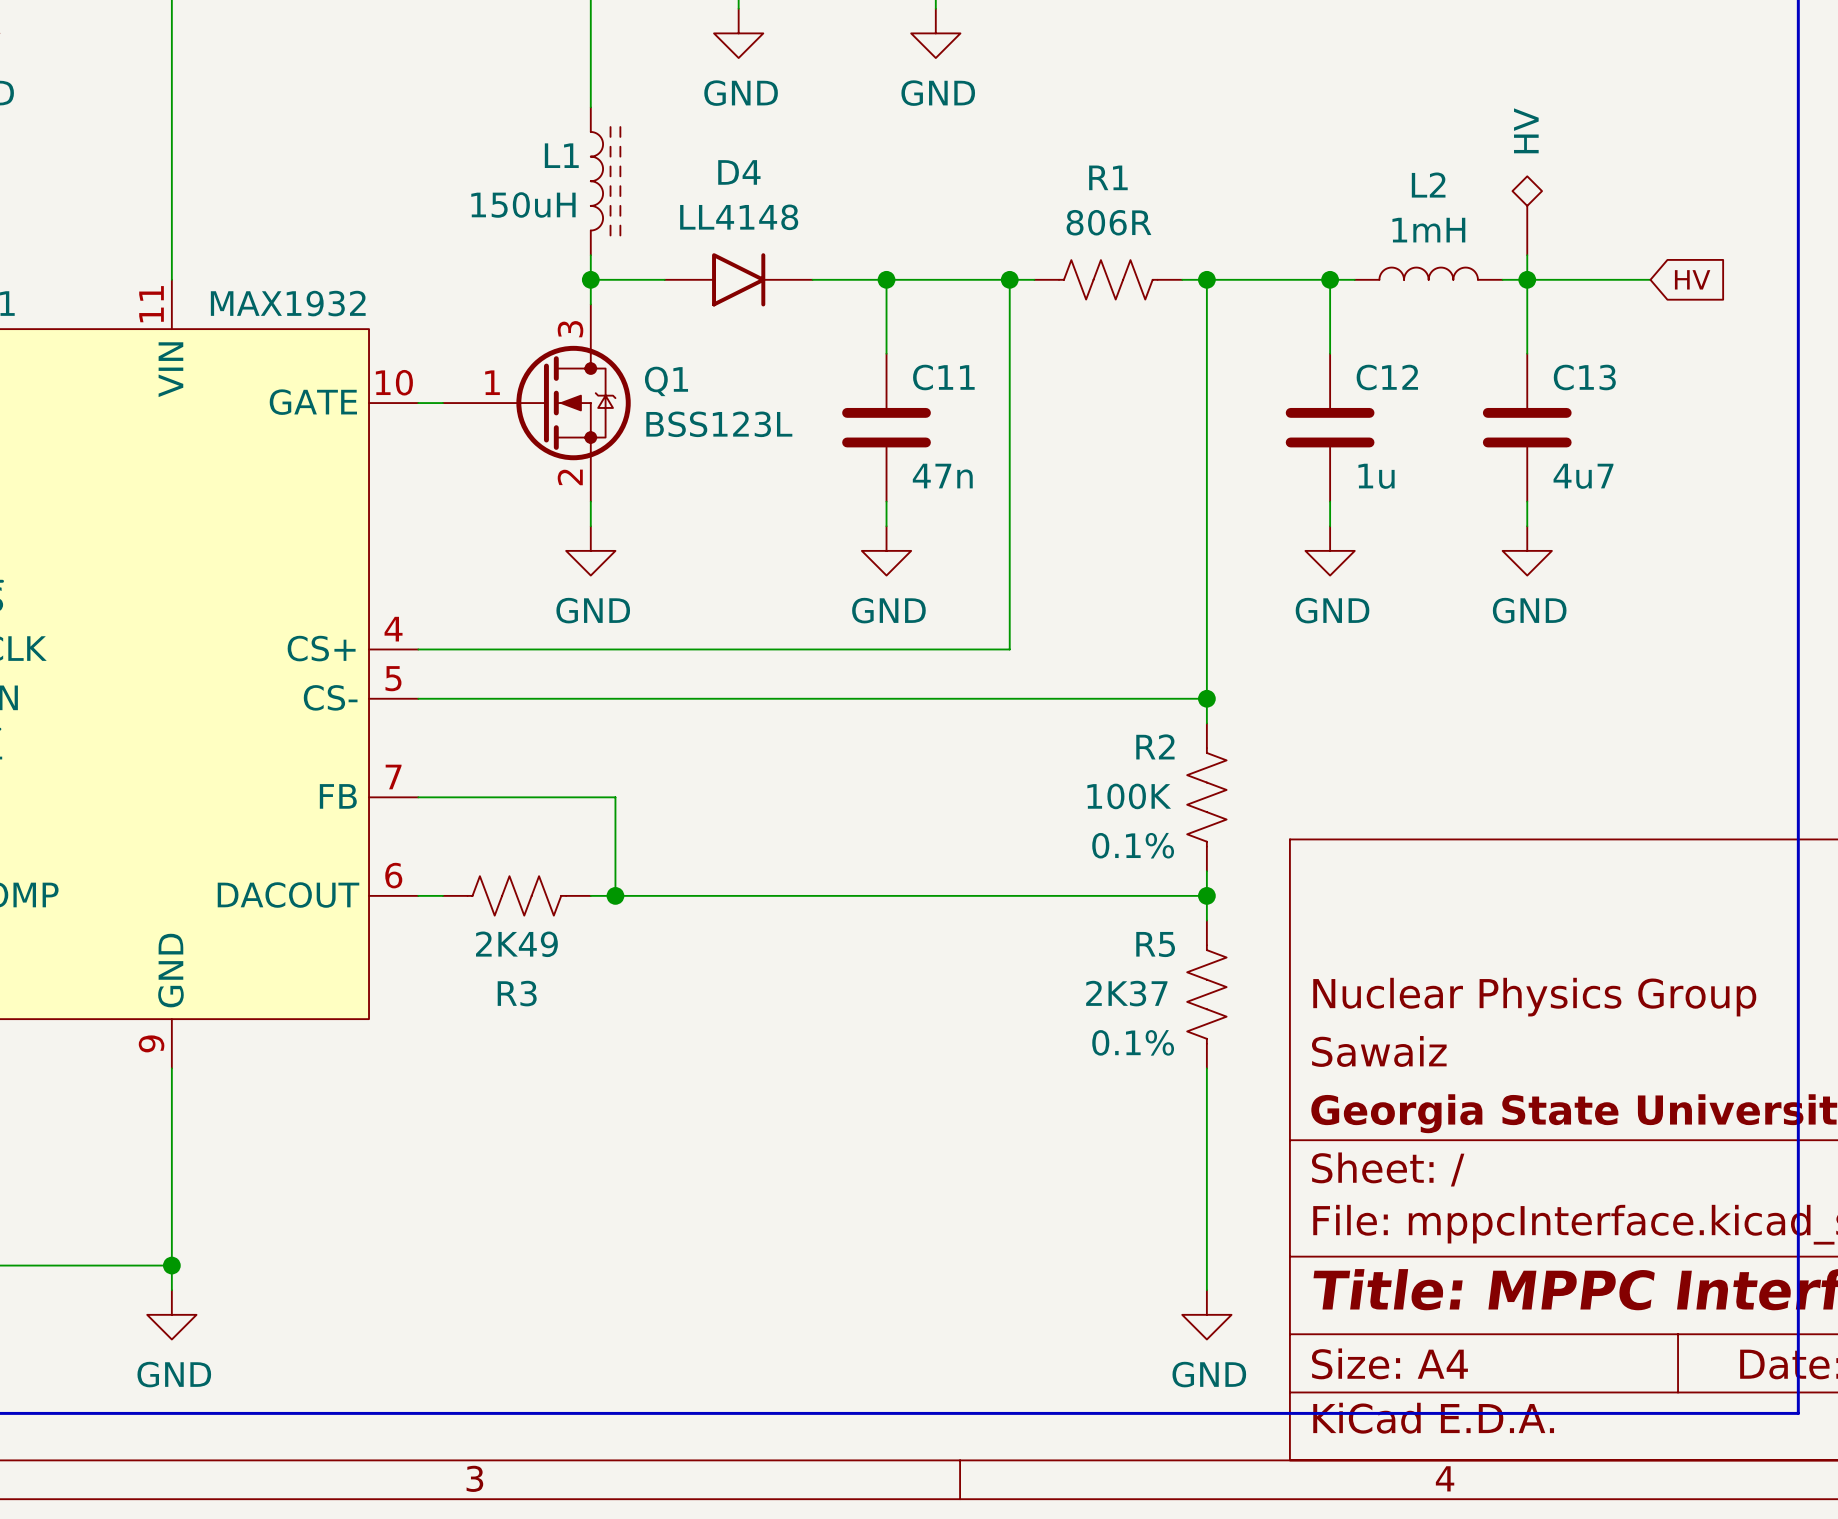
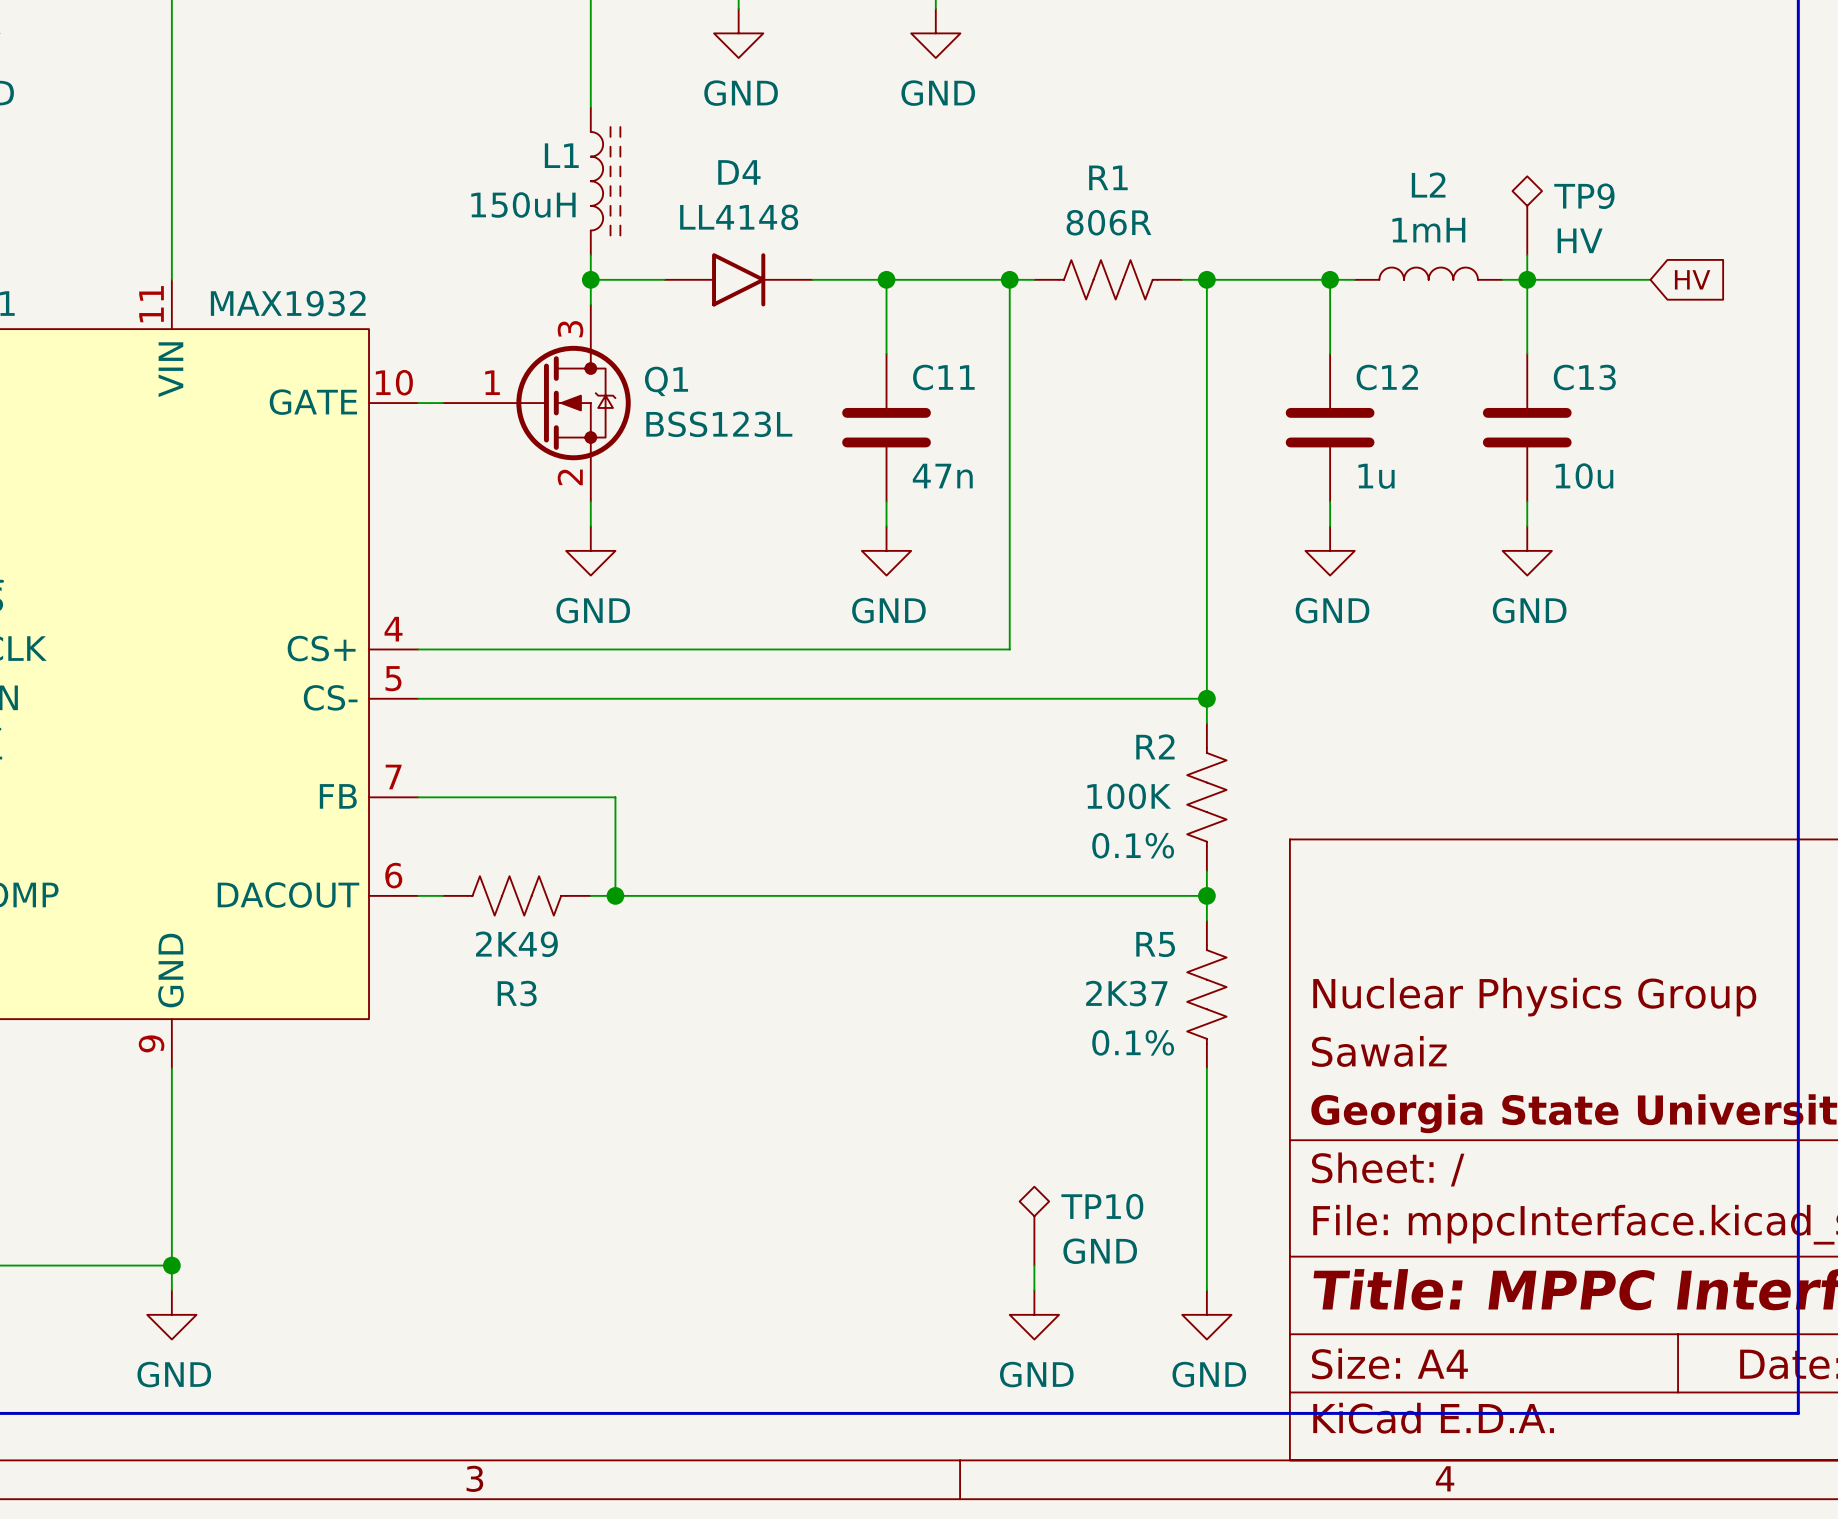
TP9 value rotation: 0° (1526, 130) -> 90° clockwise (1580, 240)
TP9 value position: HV (1526, 130) -> HV (1580, 240)
TP9 name: none -> TP9 (1584, 196)
C13 value: 4u7 (1583, 476) -> 10u (1584, 476)
TP10: none -> GND (1034, 1226)
wire: none -> (1034, 1265) (1034, 1290)
power symbol: none -> GND (1034, 1314)

